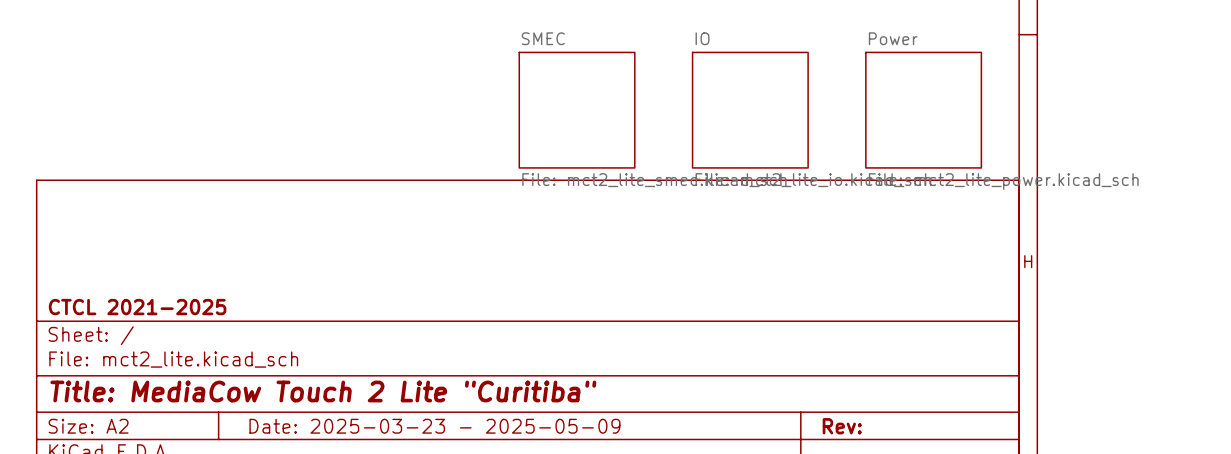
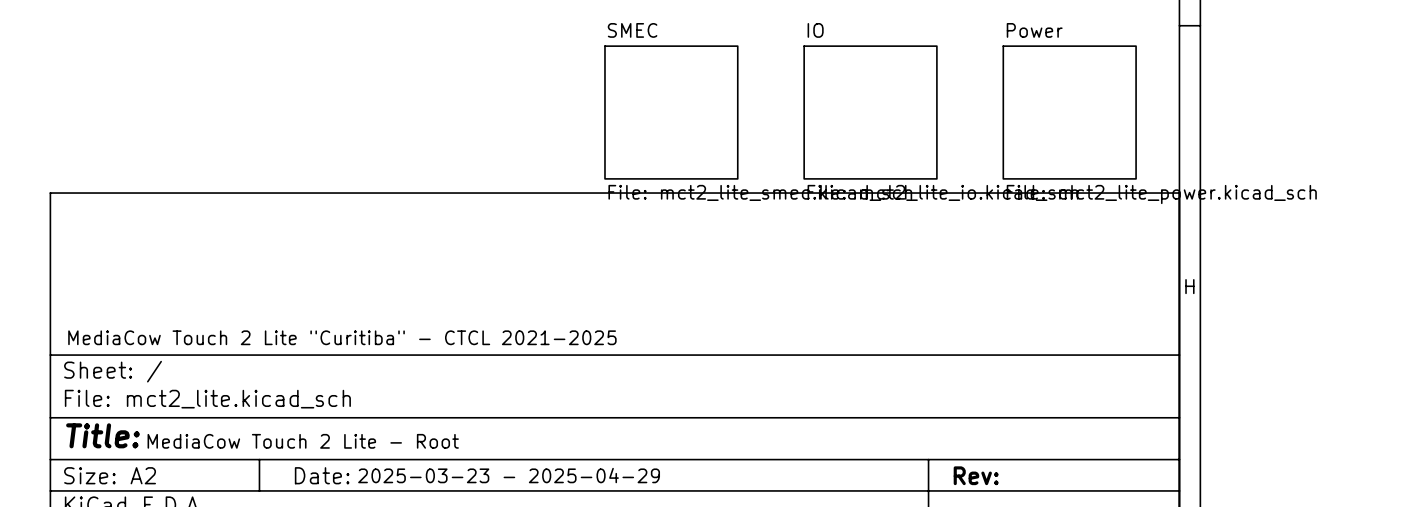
text: none -> MediaCow Touch 2 Lite "Curitiba" - CTCL 2021-2025 (342, 337)
title block: CTCL 2021-2025 (137, 307) -> none
title block: Title: MediaCow Touch 2 Lite "Curitiba" (323, 391) -> Title: (102, 435)
text: none -> MediaCow Touch 2 Lite - Root (303, 441)
title block: Date: 2025-03-23 - 2025-05-09 (434, 426) -> Date: (322, 475)
text: none -> 2025-03-23 - 2025-04-29 (509, 475)

